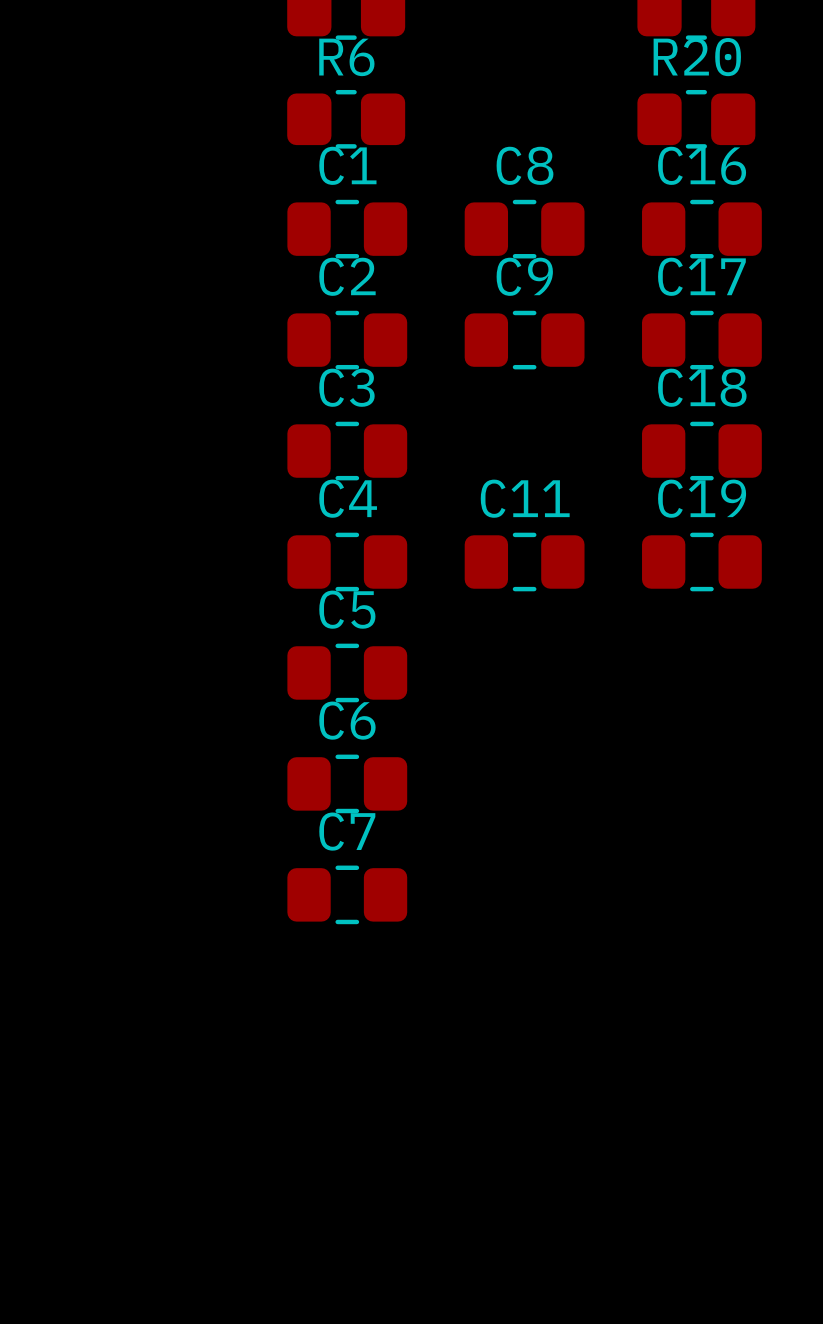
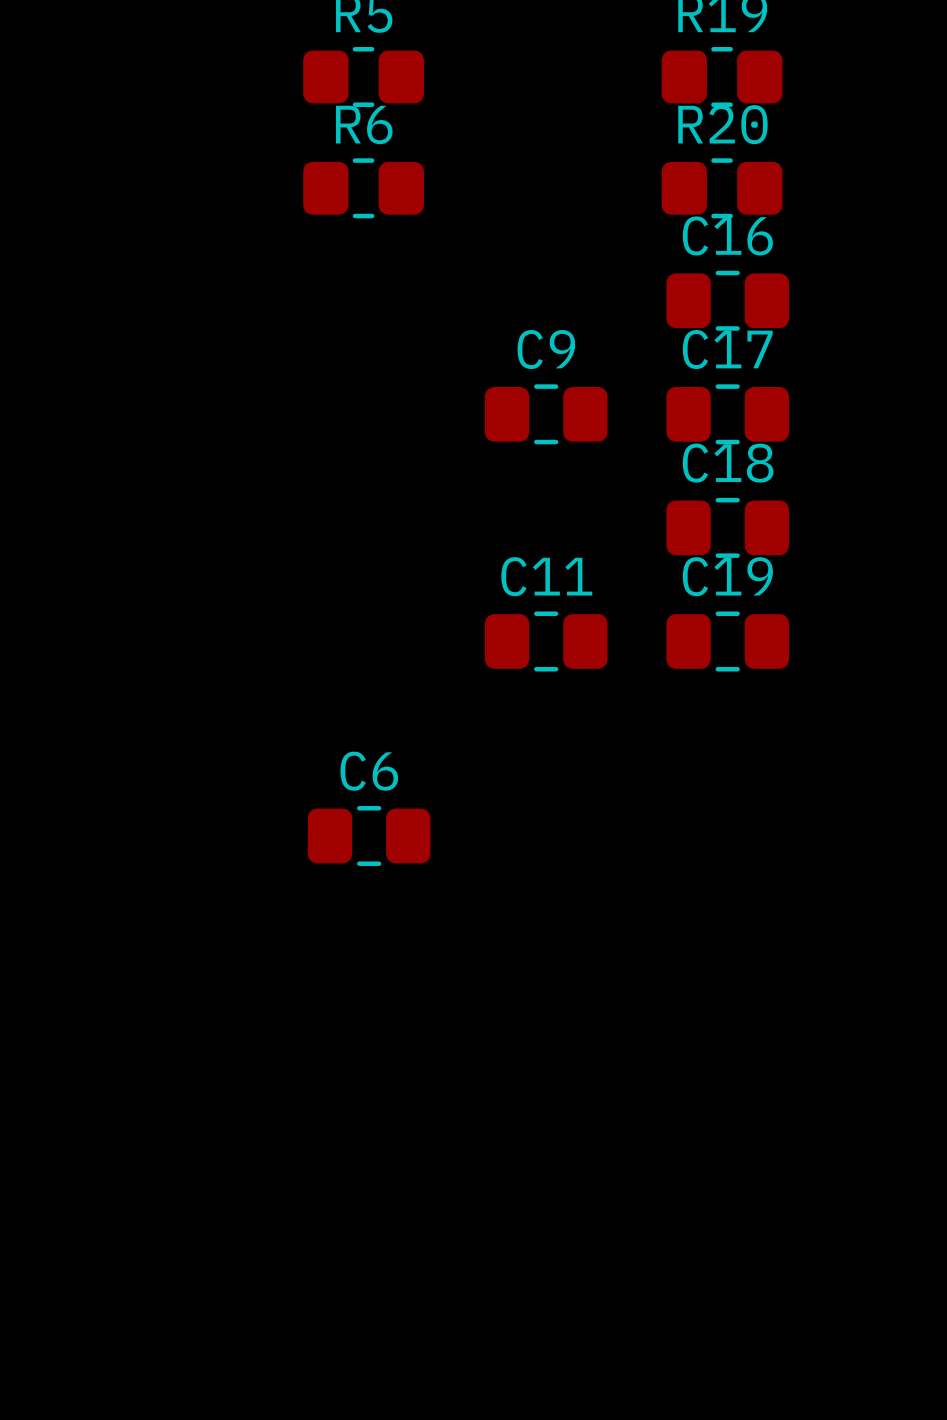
C1: (347, 229) -> none
C8: (524, 229) -> none
C2: (347, 340) -> none
C3: (347, 451) -> none
C4: (347, 562) -> none
C5: (347, 672) -> none
C6 position: (347, 783) -> (369, 835)
C7: (347, 894) -> none

